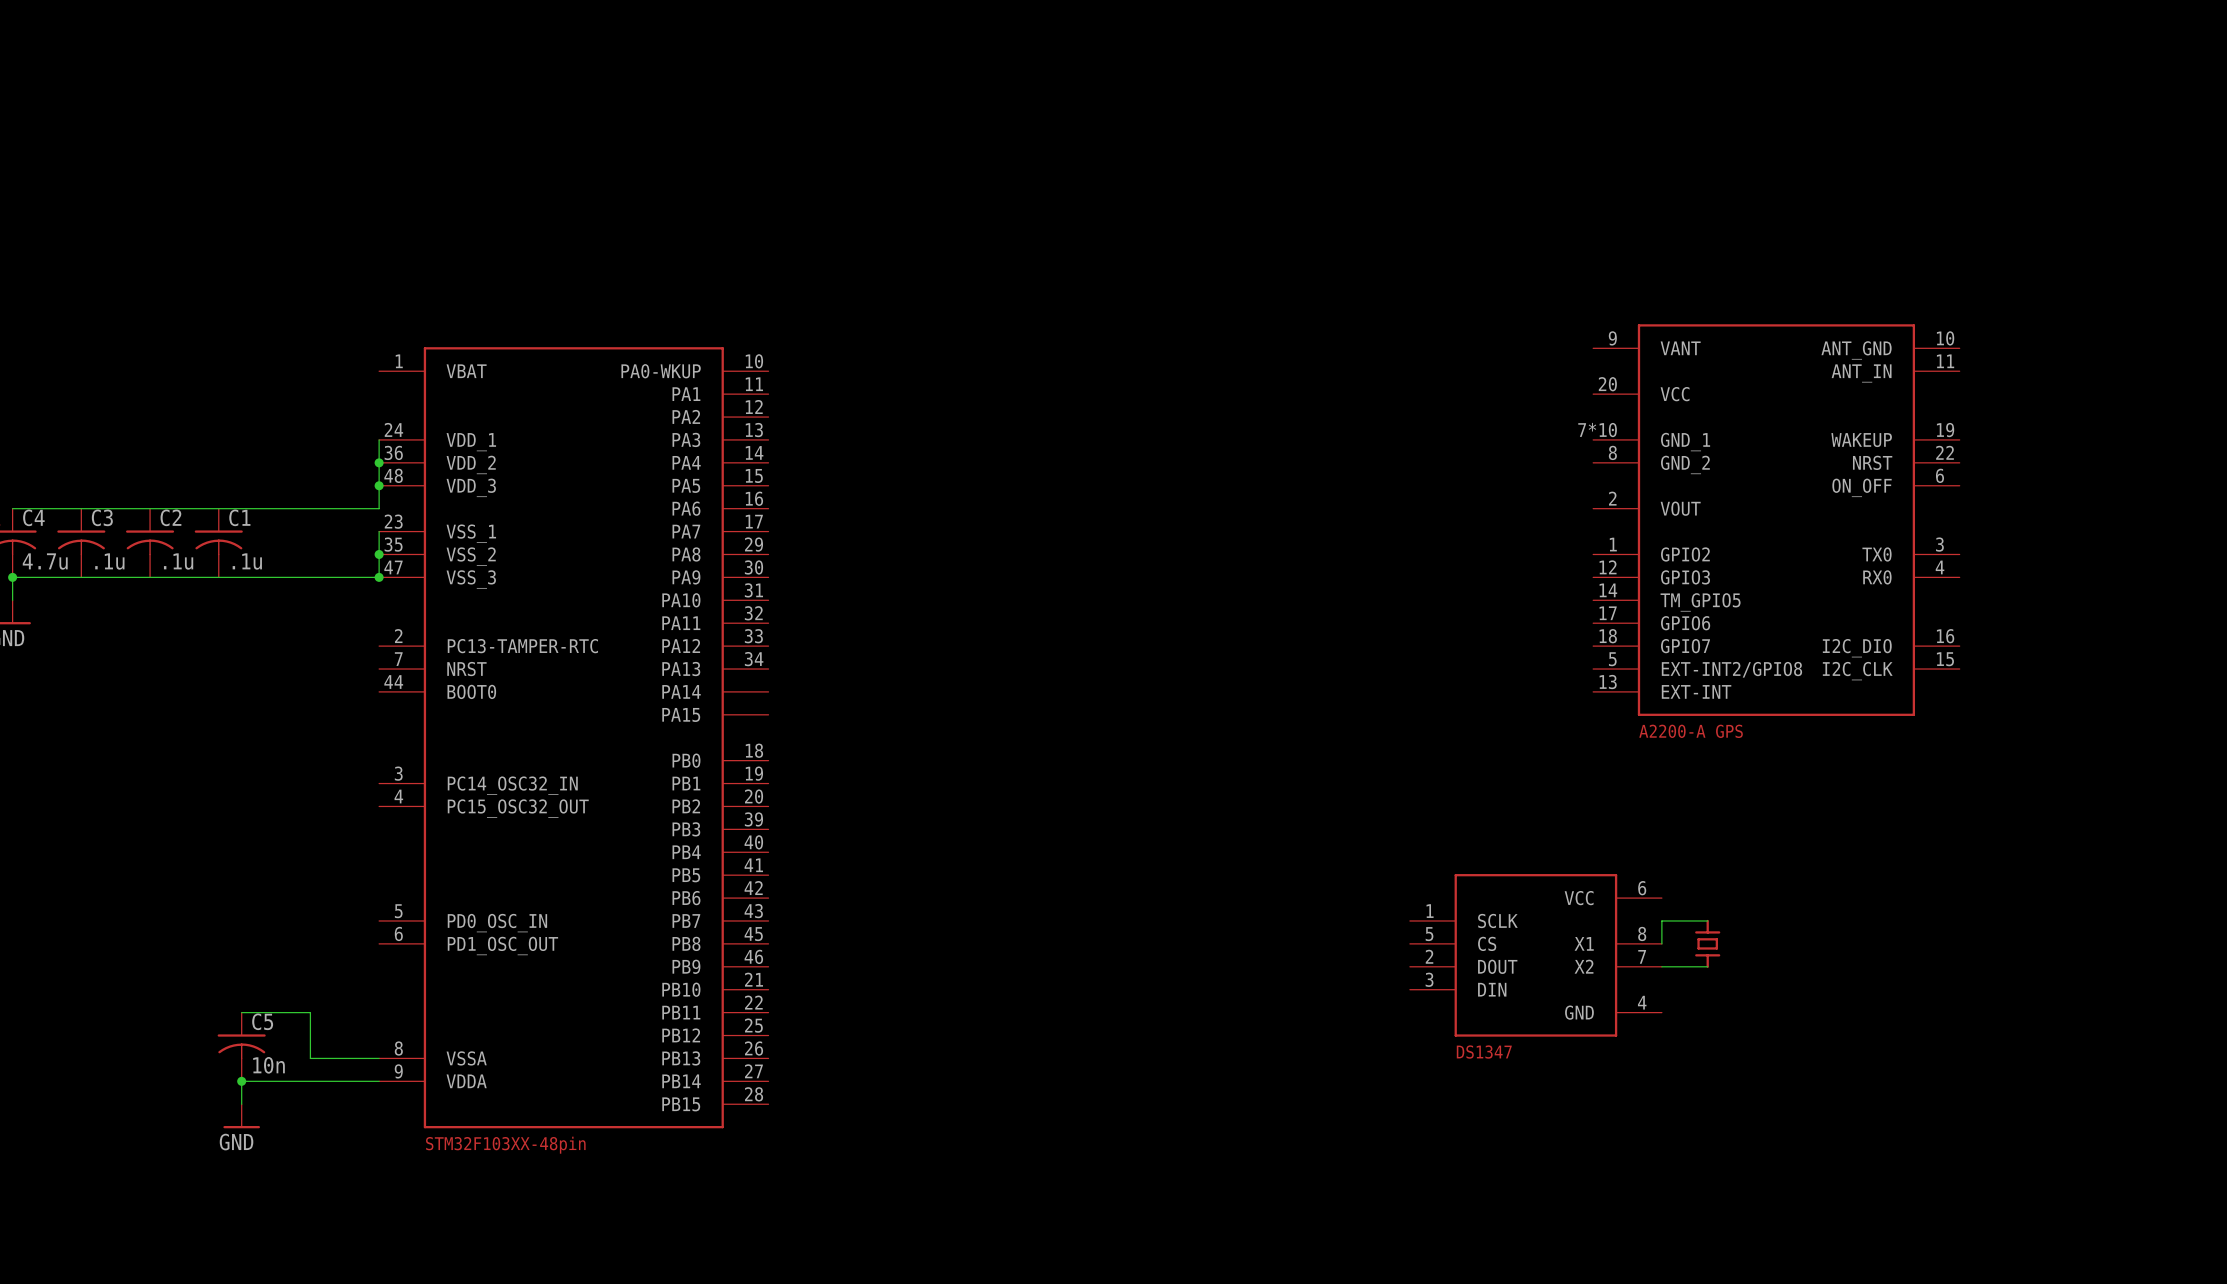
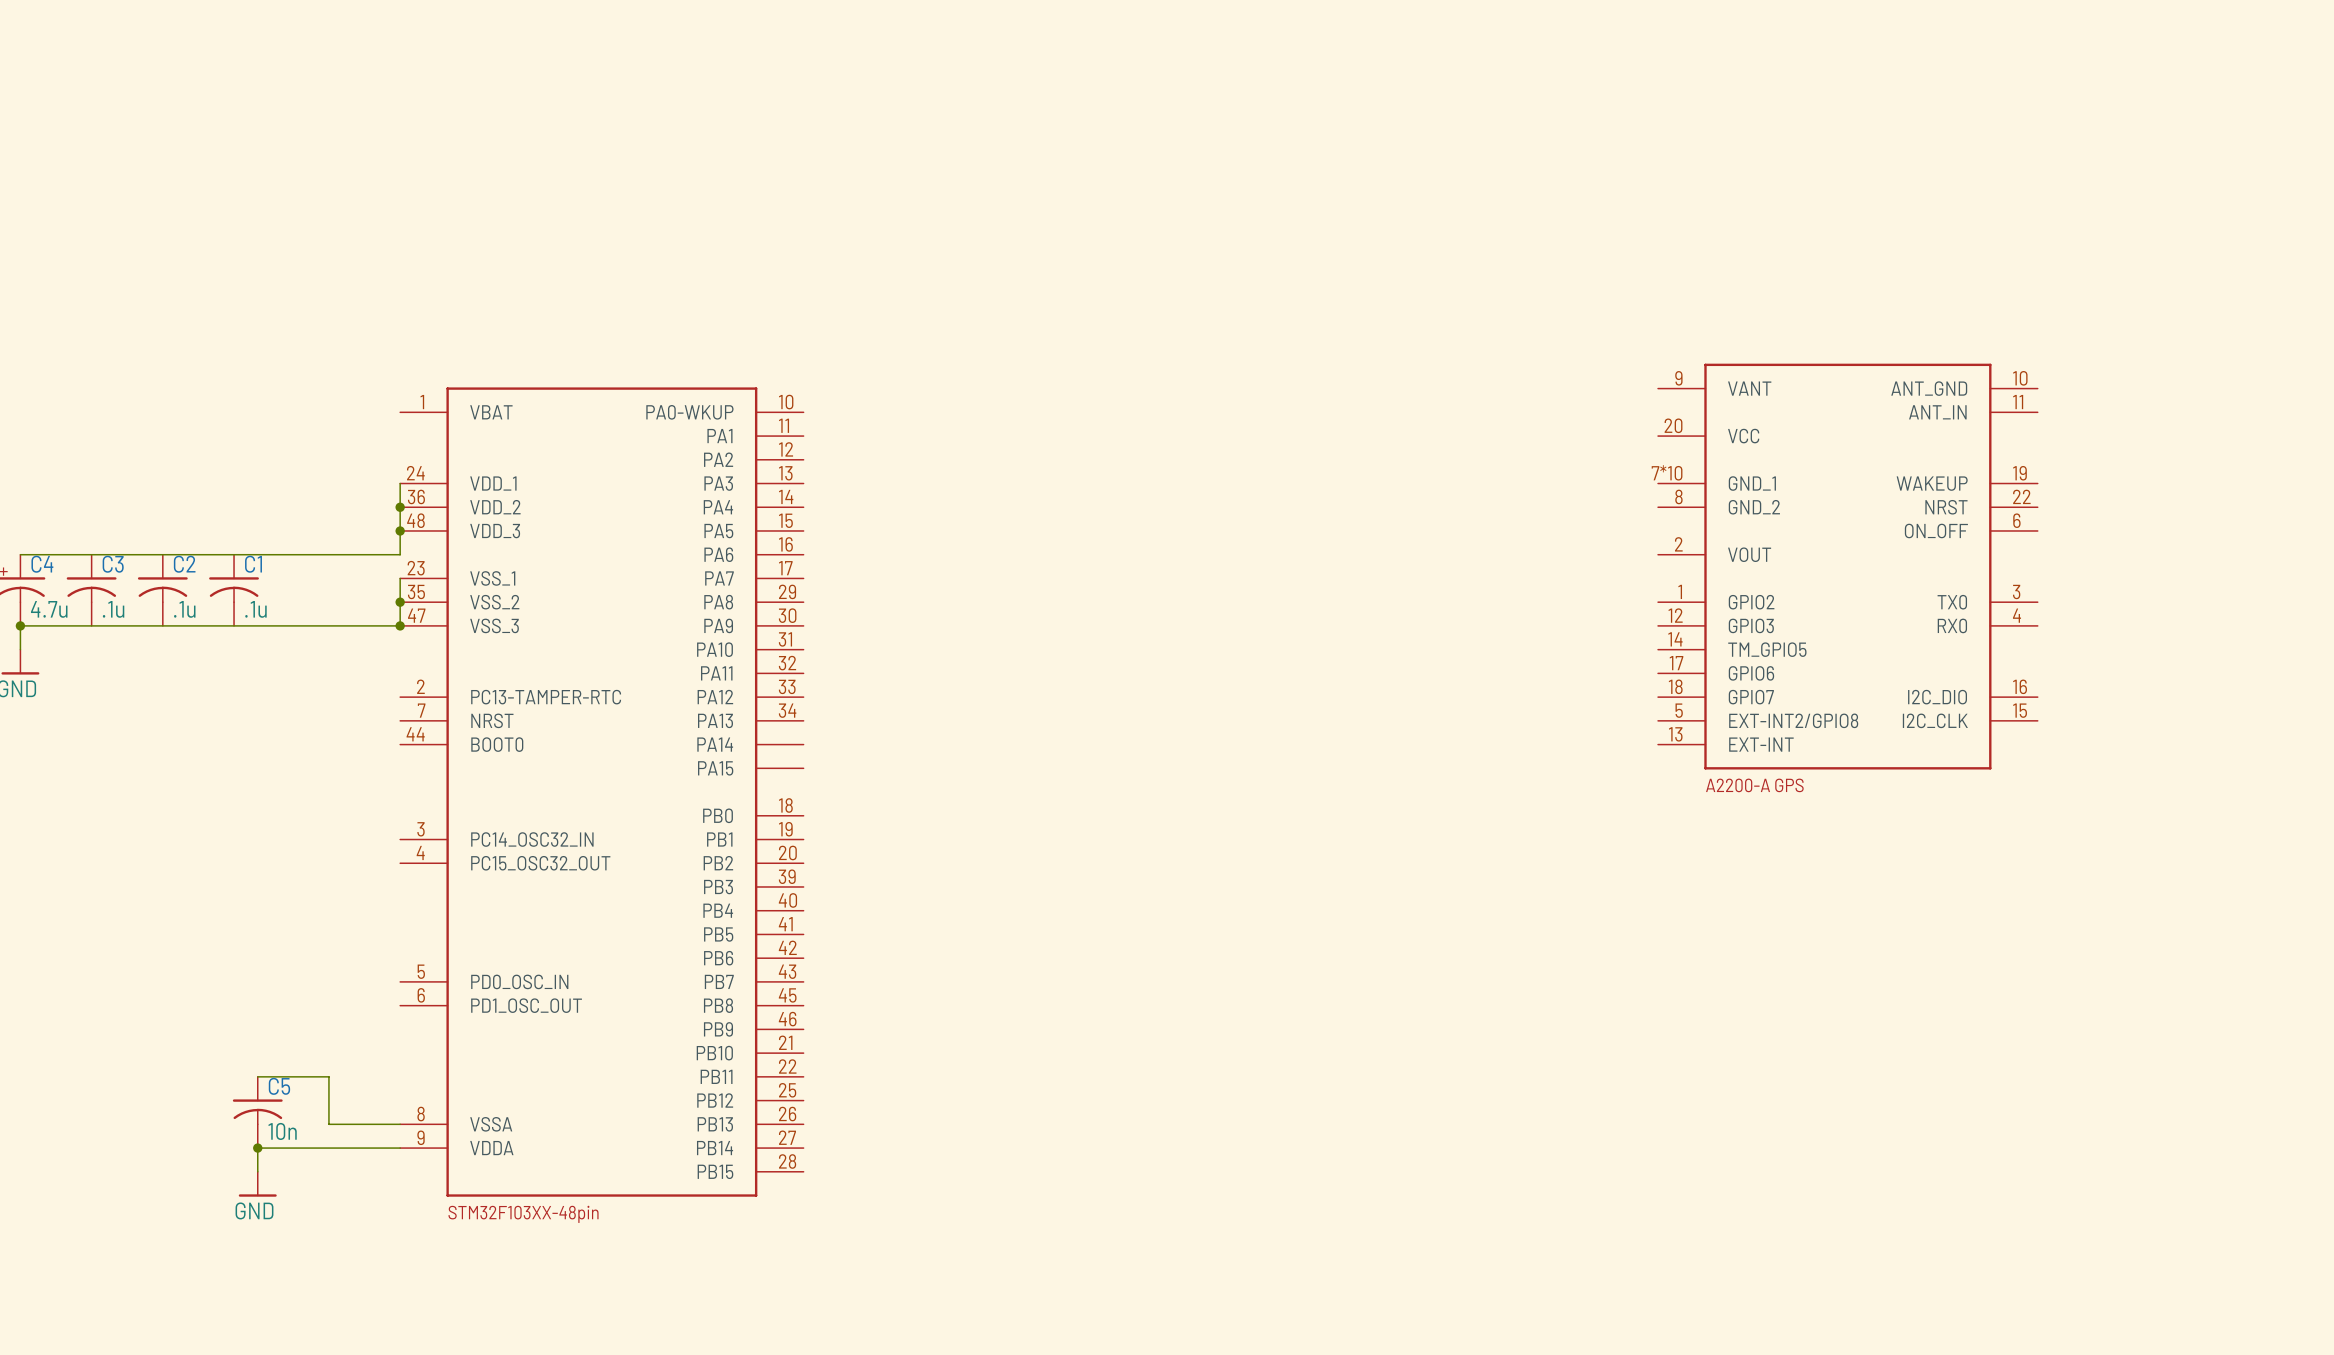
wire: (1707, 920) (1661, 920) (1661, 943) -> none
part: (1707, 943) -> none
part: (1535, 955) -> none
wire: (1661, 966) (1707, 966) -> none

